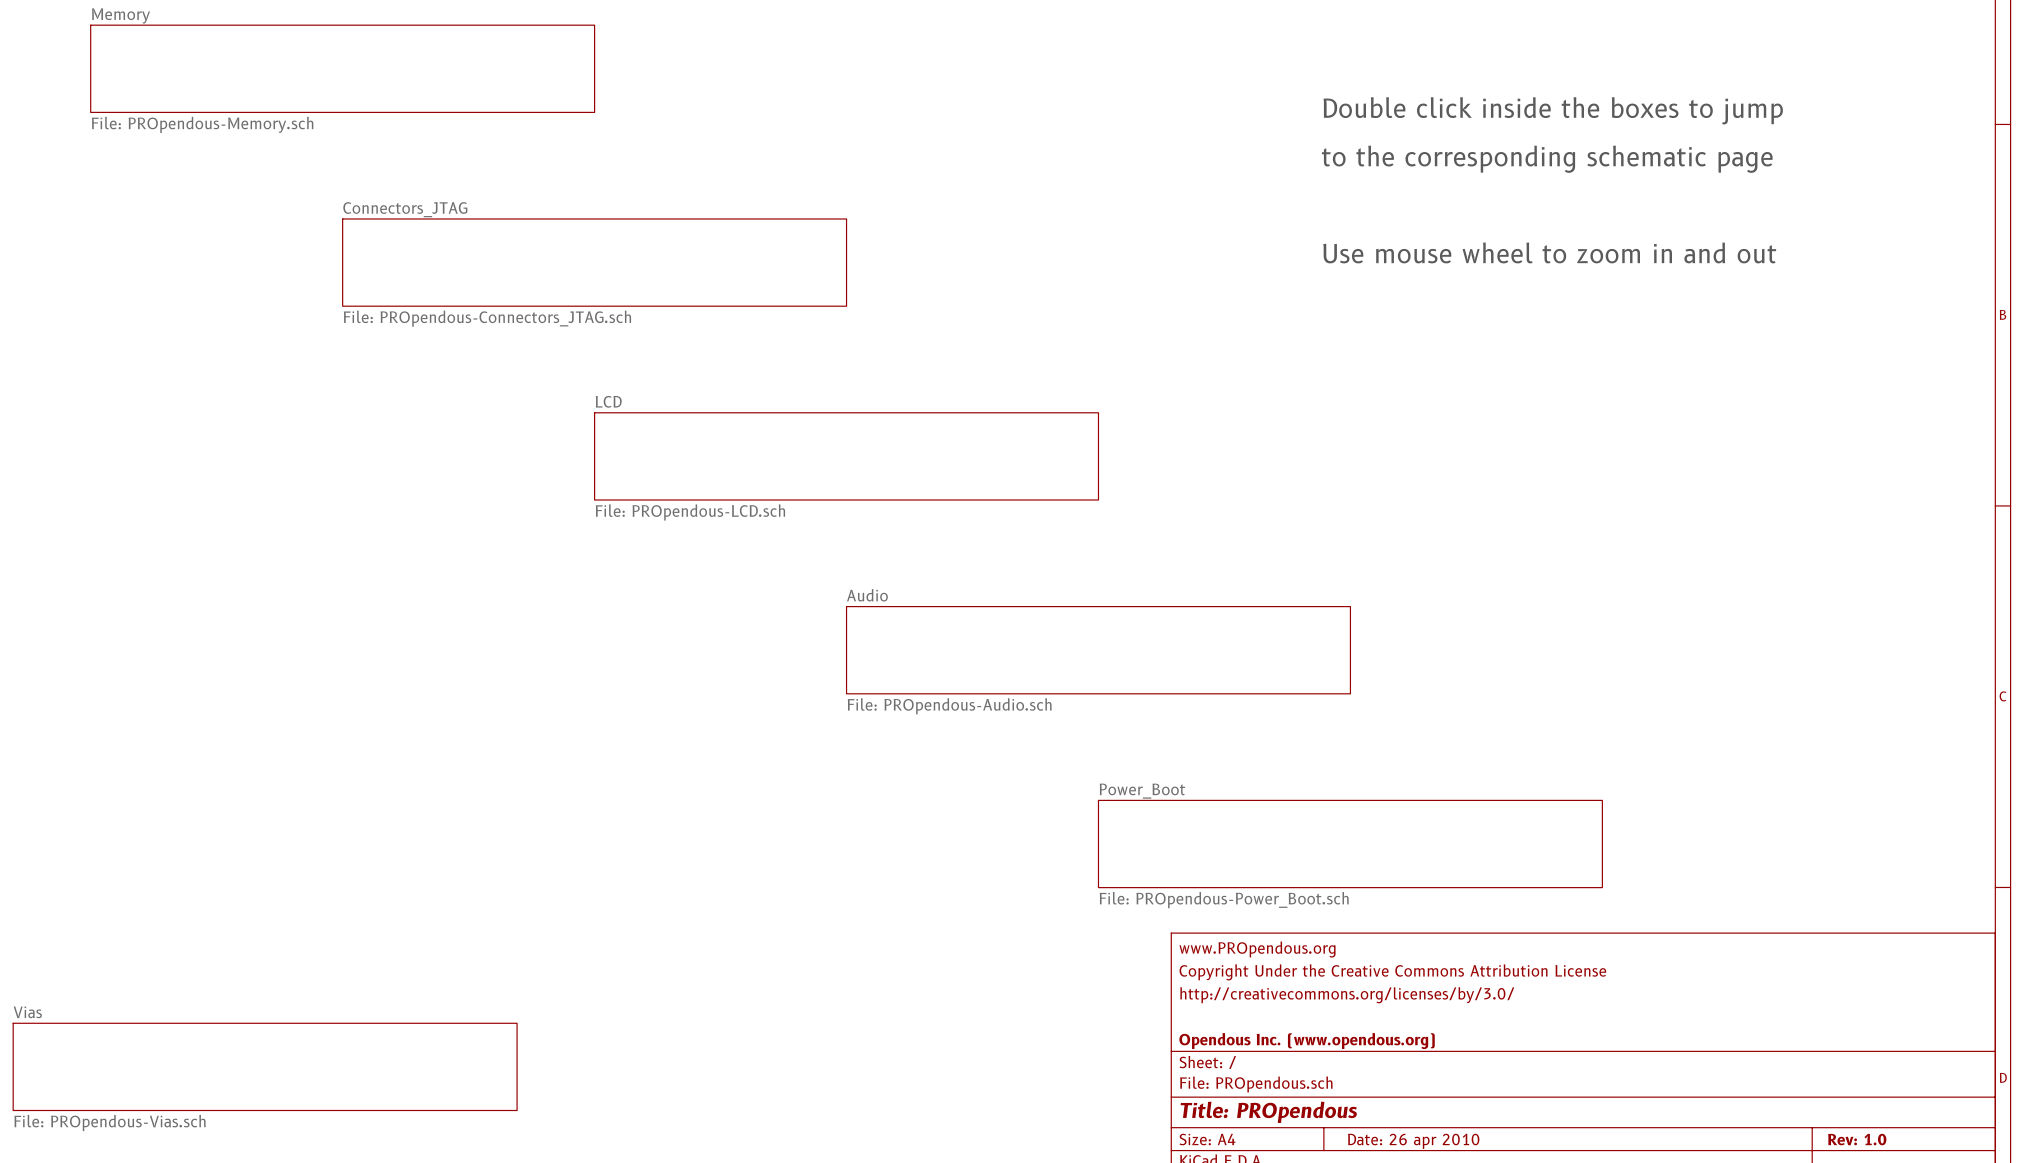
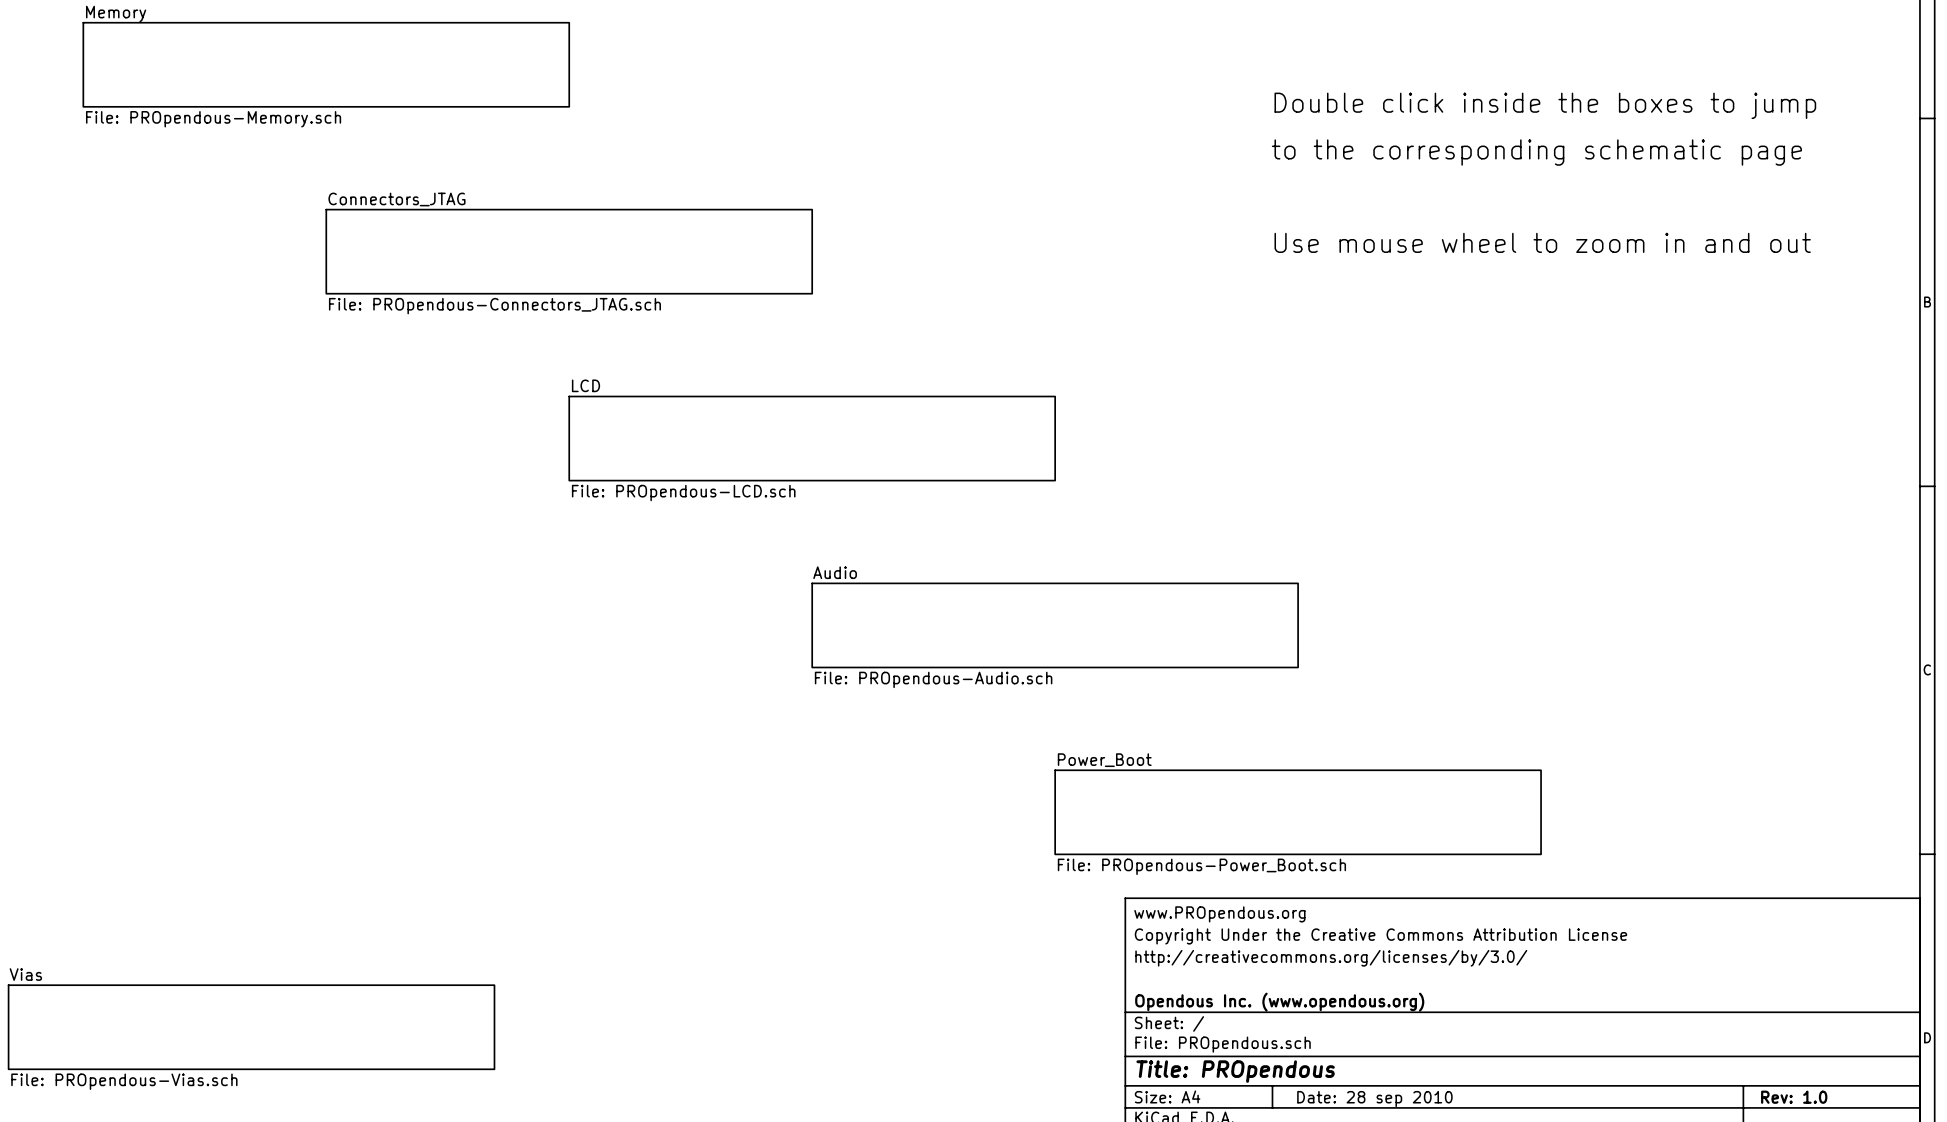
title block: Date: 26 apr 2010 (1413, 1141) -> Date: 28 sep 2010 (1374, 1099)

